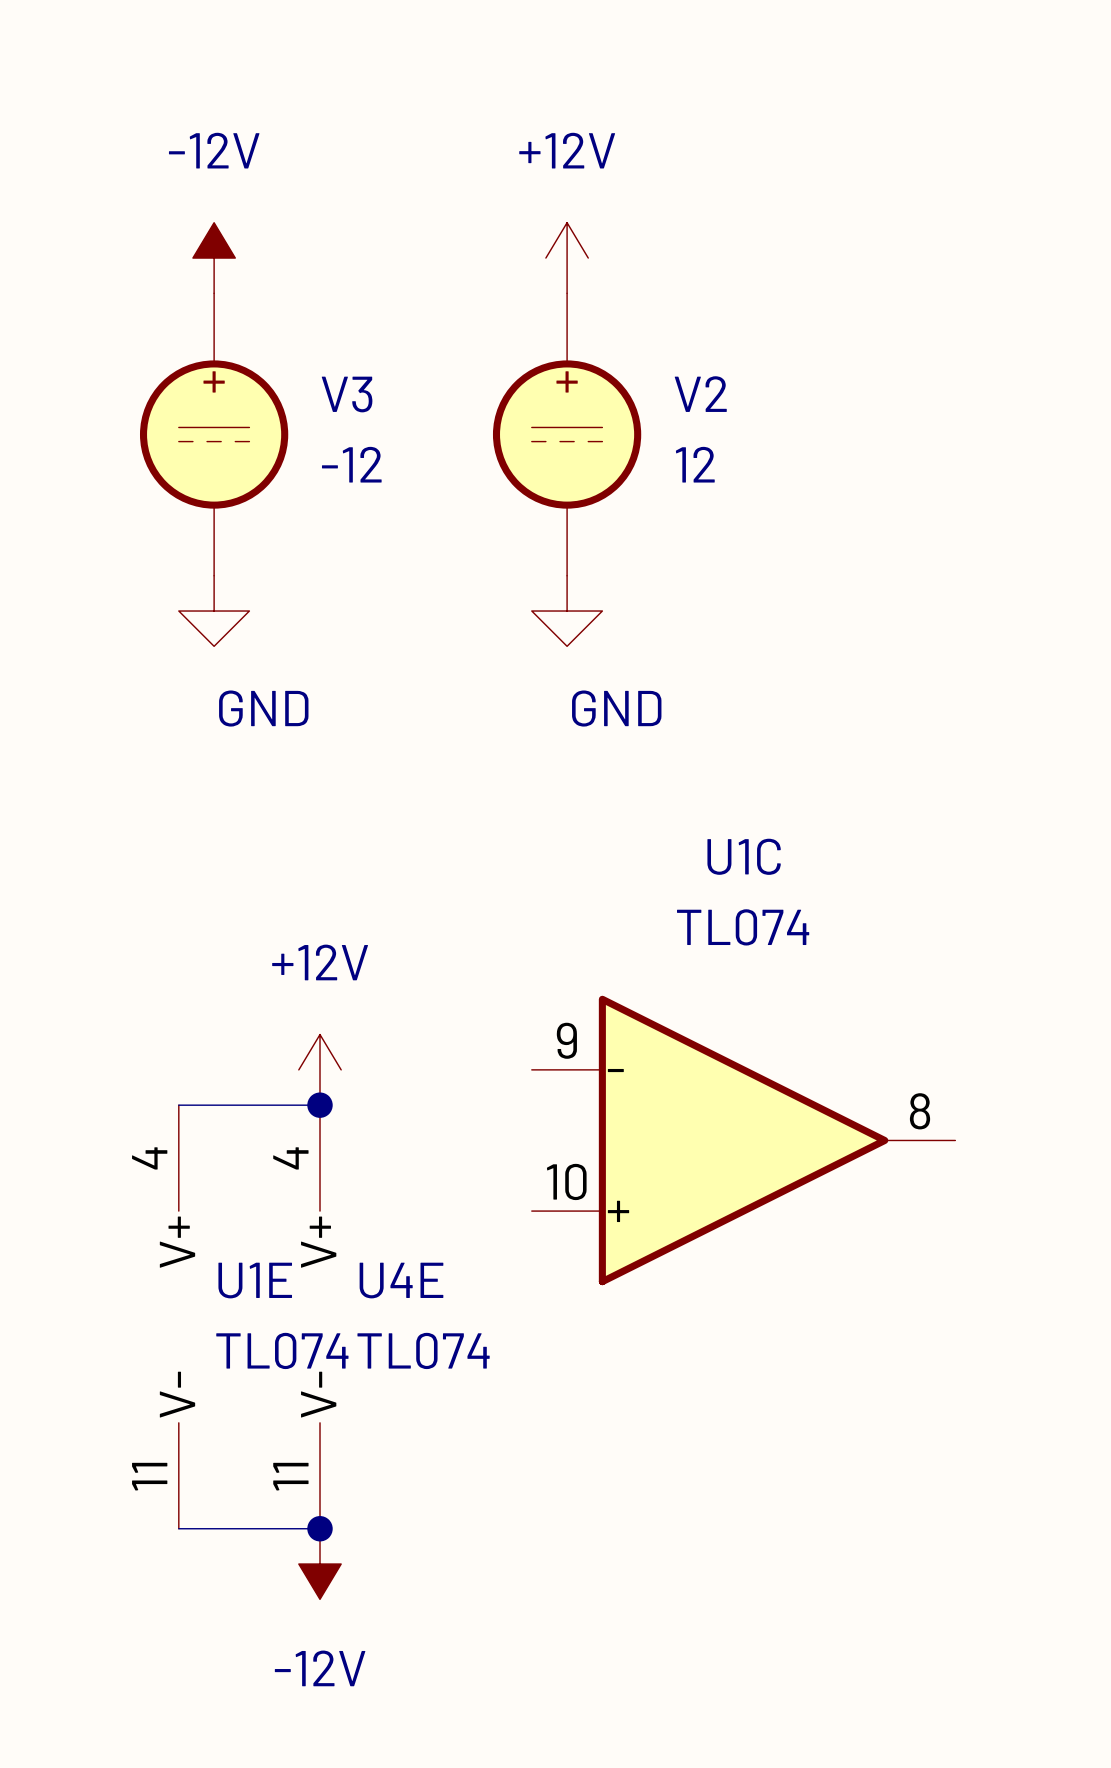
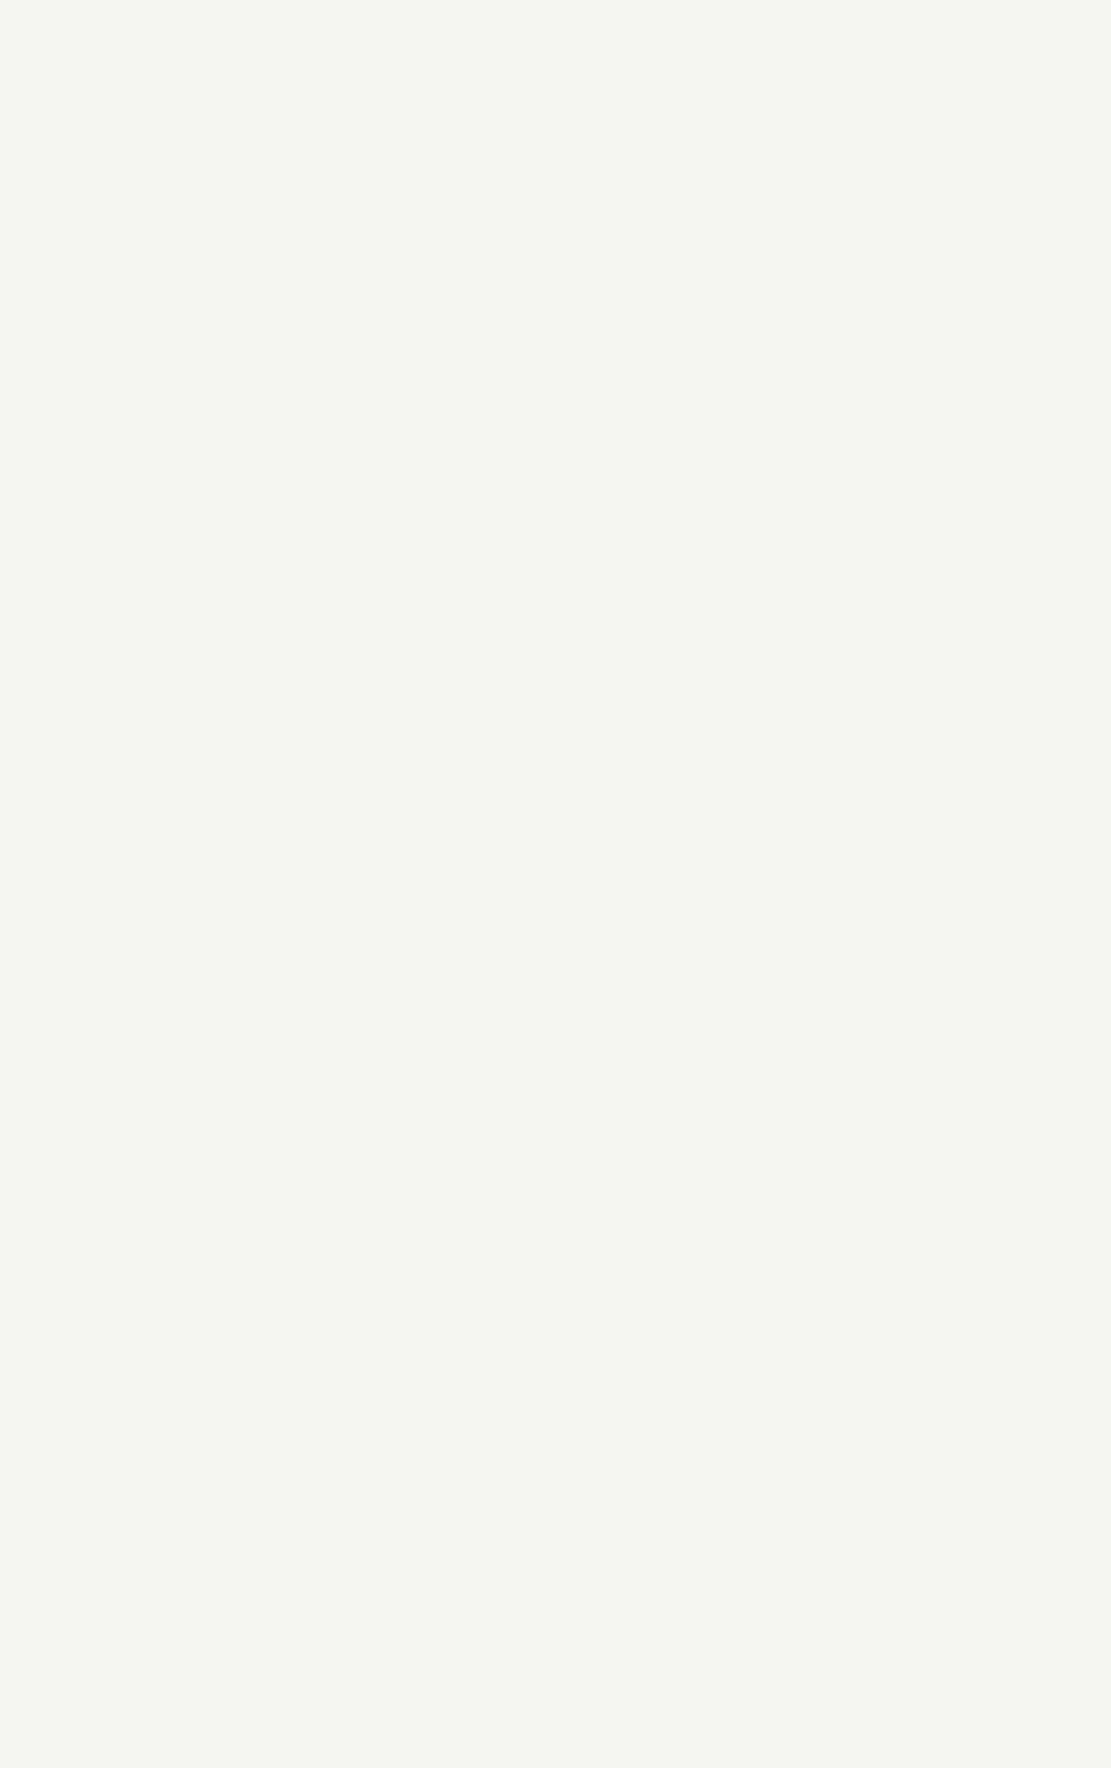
power symbol: -12V (214, 258) -> none
power symbol: +12V (567, 258) -> none
V3: -12 (214, 434) -> none
V2: 12 (567, 434) -> none
power symbol: GND (214, 611) -> none
power symbol: GND (567, 611) -> none
power symbol: +12V (320, 1069) -> none
wire: (178, 1105) (320, 1105) -> none
junction: (320, 1105) -> none
U1C: TL074 (743, 1140) -> none
U1E: TL074 (178, 1316) -> none
U4E: TL074 (320, 1316) -> none
wire: (178, 1528) (320, 1528) -> none
junction: (320, 1528) -> none
power symbol: -12V (320, 1564) -> none

